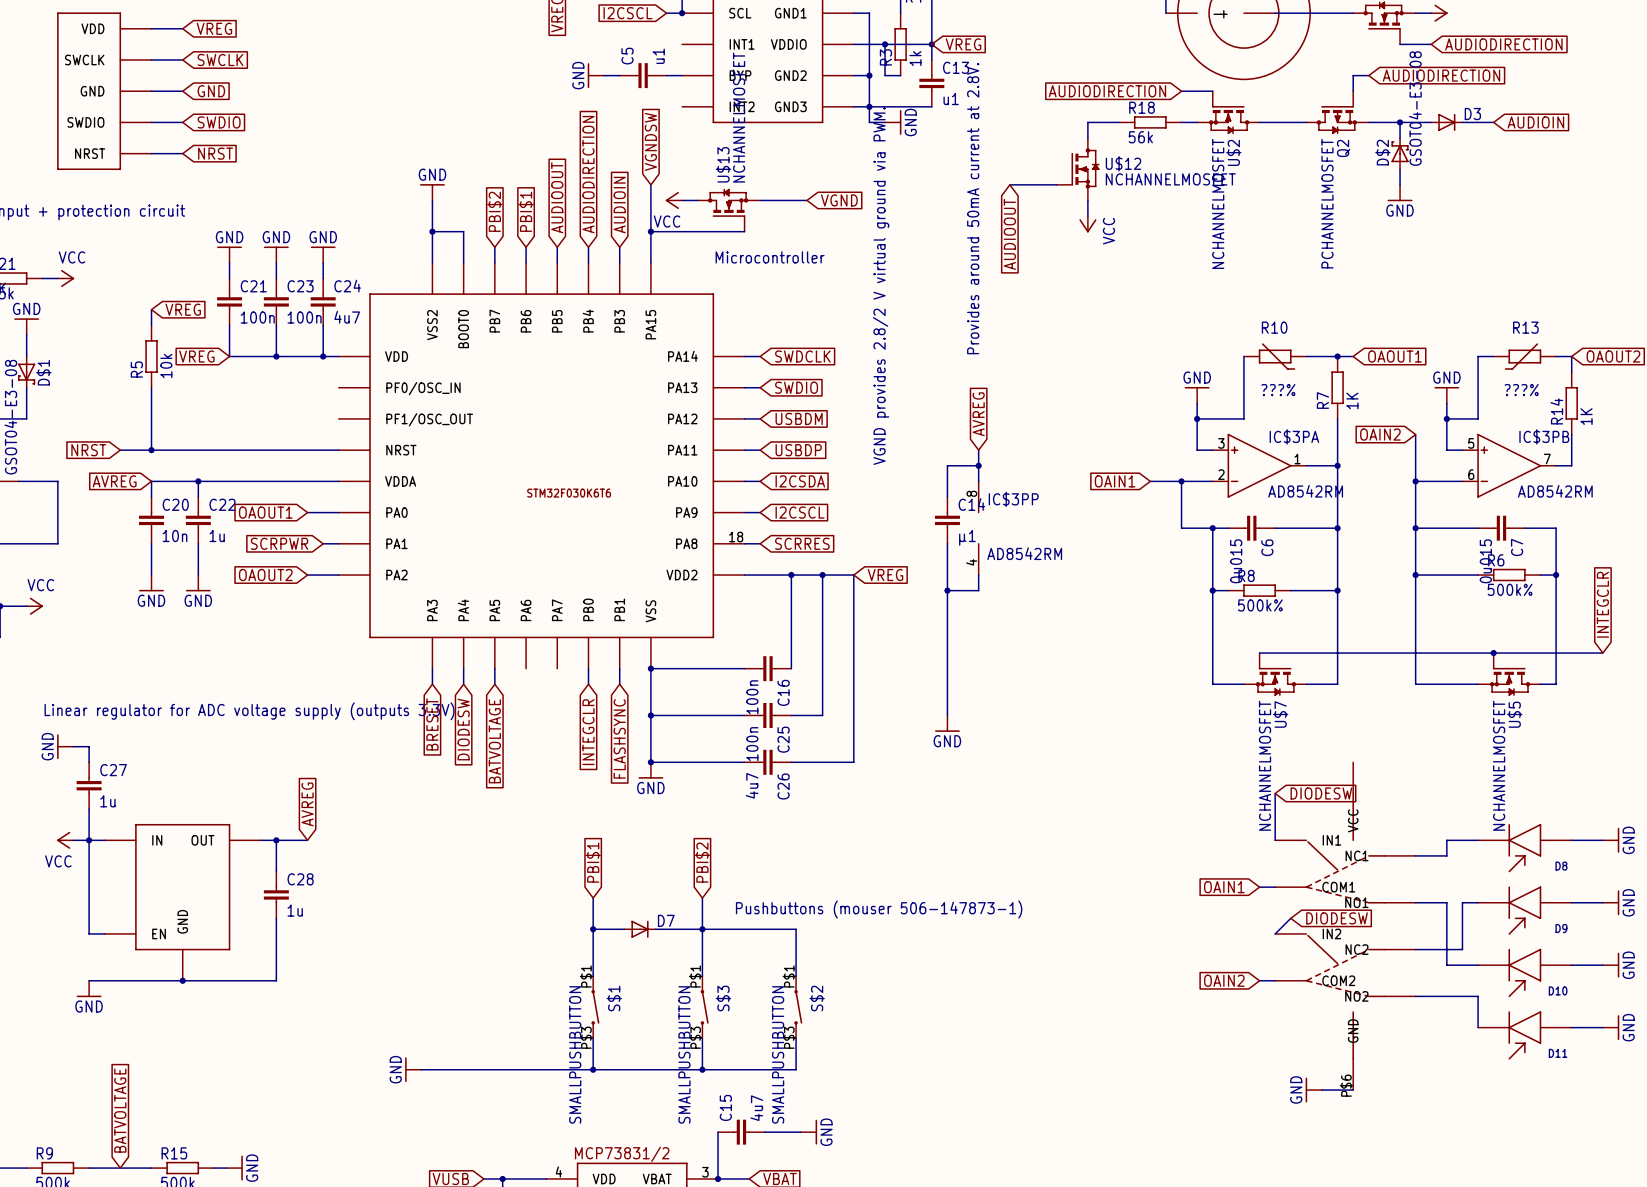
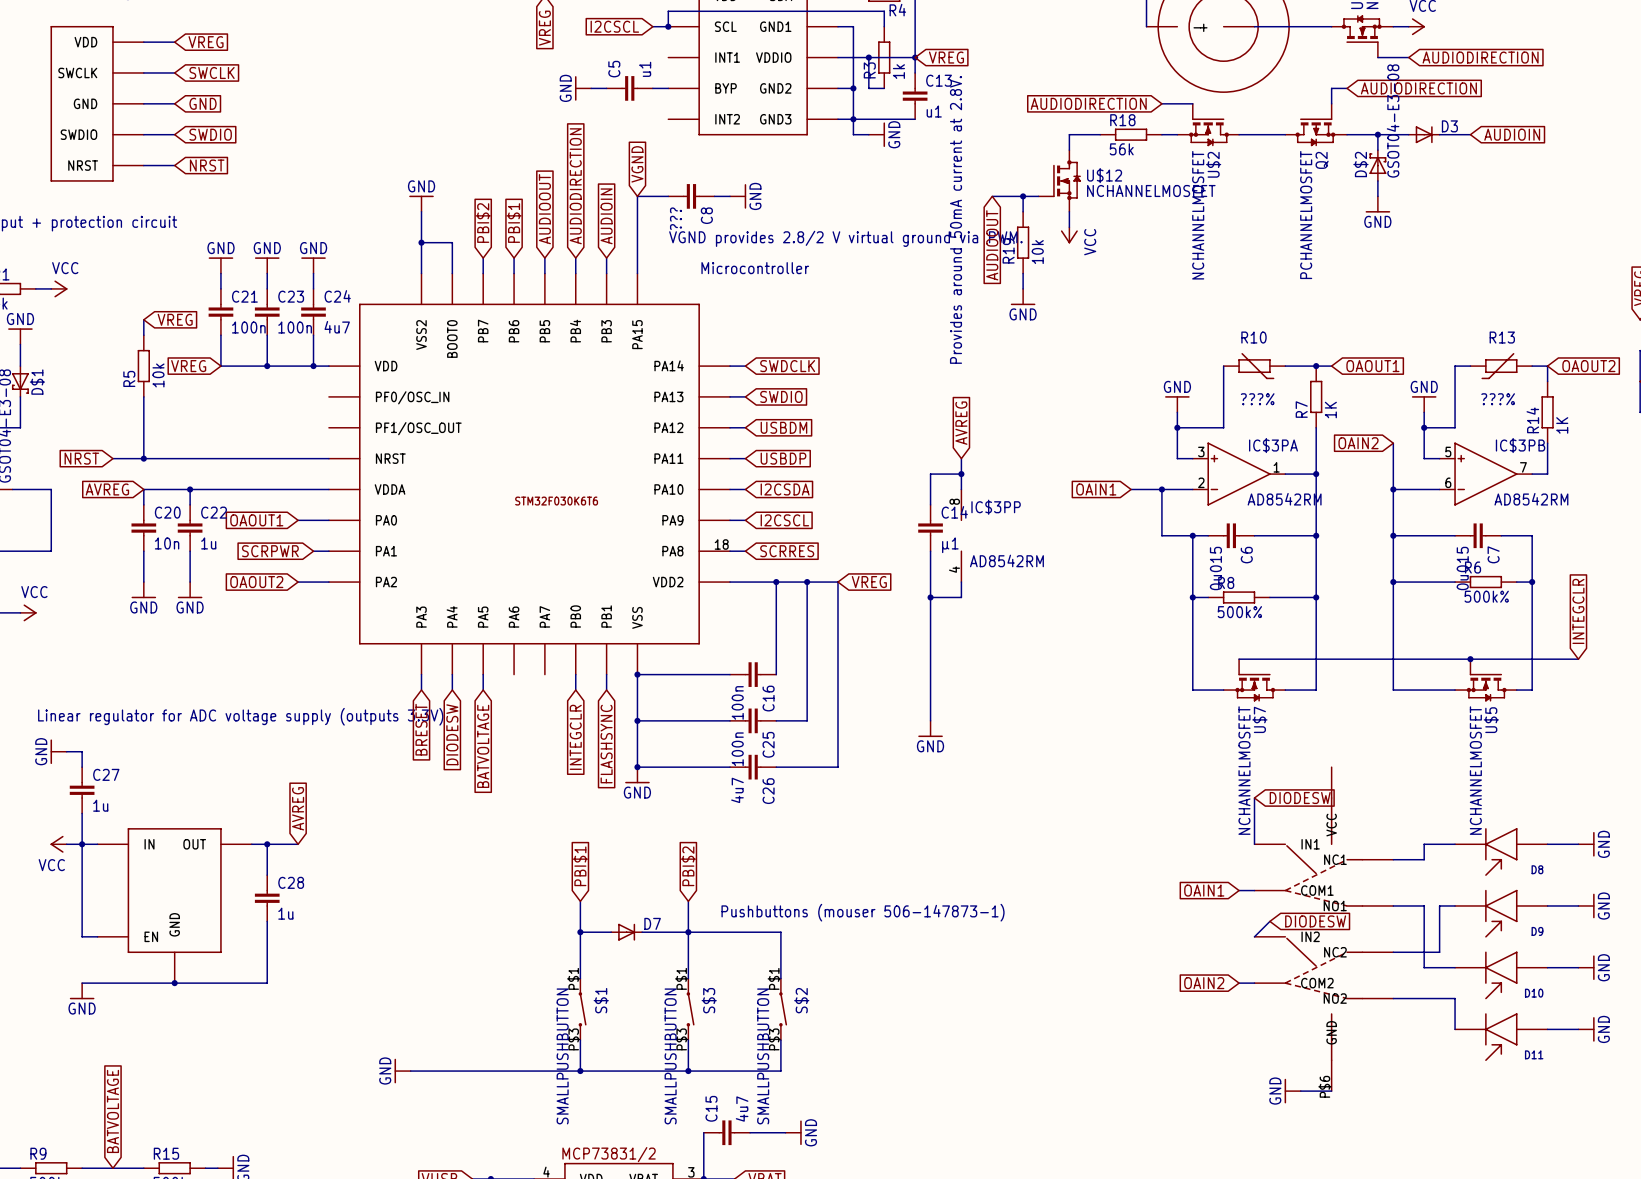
global label: VGNDSW (650, 141) -> VGND (637, 164)
wire: none -> (637, 196) (668, 196)
C8: none -> ??? (691, 196)
power symbol: none -> GND (738, 196)
wire: none -> (1023, 196) (1023, 211)
junction: none -> (1023, 196)
power symbol: VCC (673, 200) -> none
wire: (682, 200) (697, 200) -> (714, 196) (730, 196)
wire: (760, 200) (806, 200) -> none
global label: VGND (839, 200) -> none
U$13: NCHANNELMOSFET (728, 210) -> none
text: none -> VGND provides 2.8/2 V virtual ground via PWM. (845, 238)
wire: (650, 231) (744, 231) -> none
junction: (650, 231) -> none
R19: none -> 10k (1023, 242)
wire: none -> (1023, 273) (1023, 288)
text: VGND provides 2.8/2 V virtual ground via PWM. (881, 286) -> none
power symbol: none -> GND (1023, 297)

